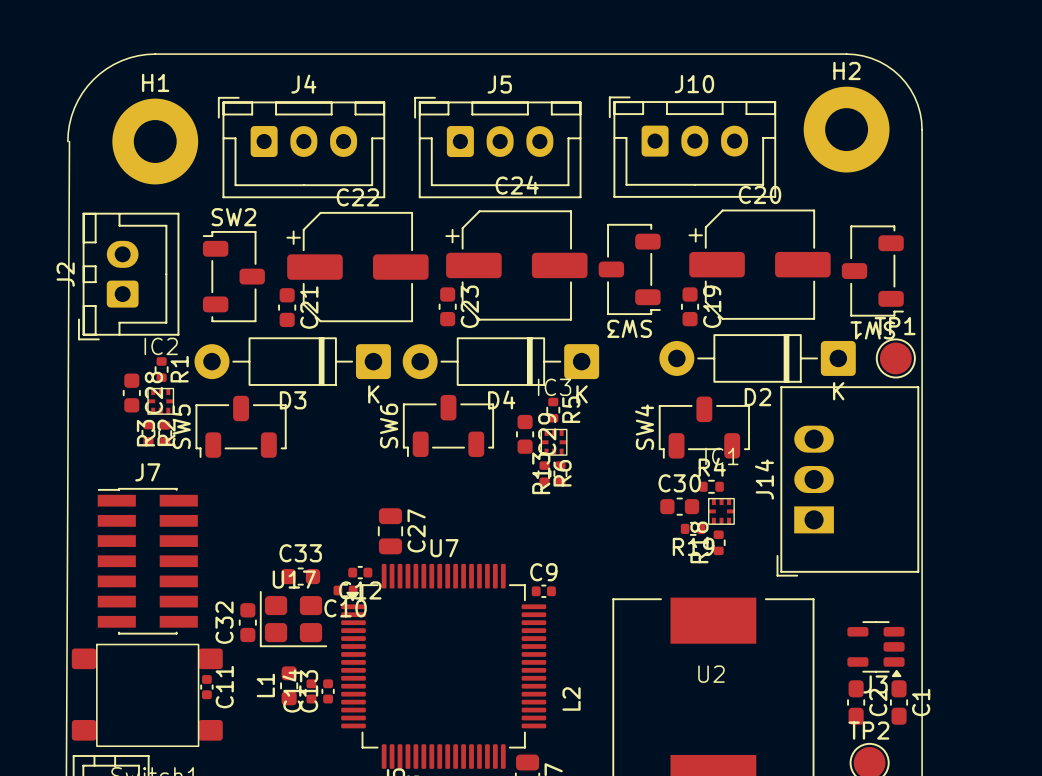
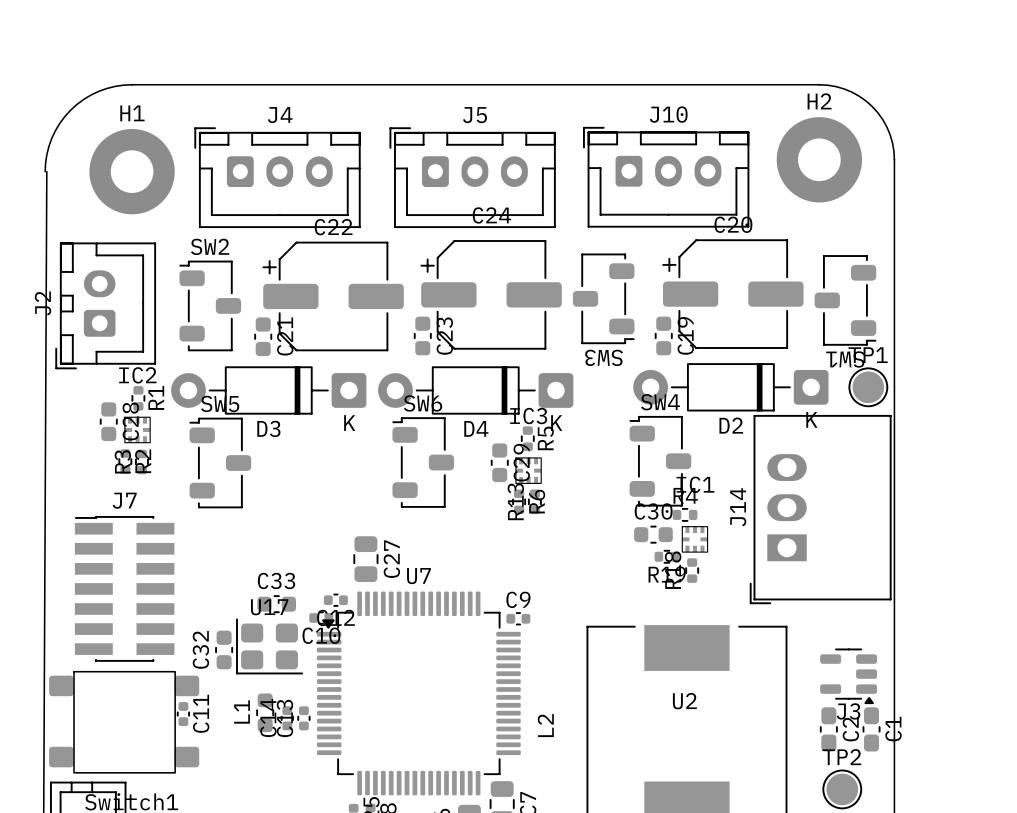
SW5 rotation: 0° (241, 426) -> 90° clockwise (220, 462)
SW6 rotation: 0° (448, 426) -> 90° clockwise (423, 462)
SW4 rotation: 0° (704, 427) -> 90° clockwise (660, 461)

